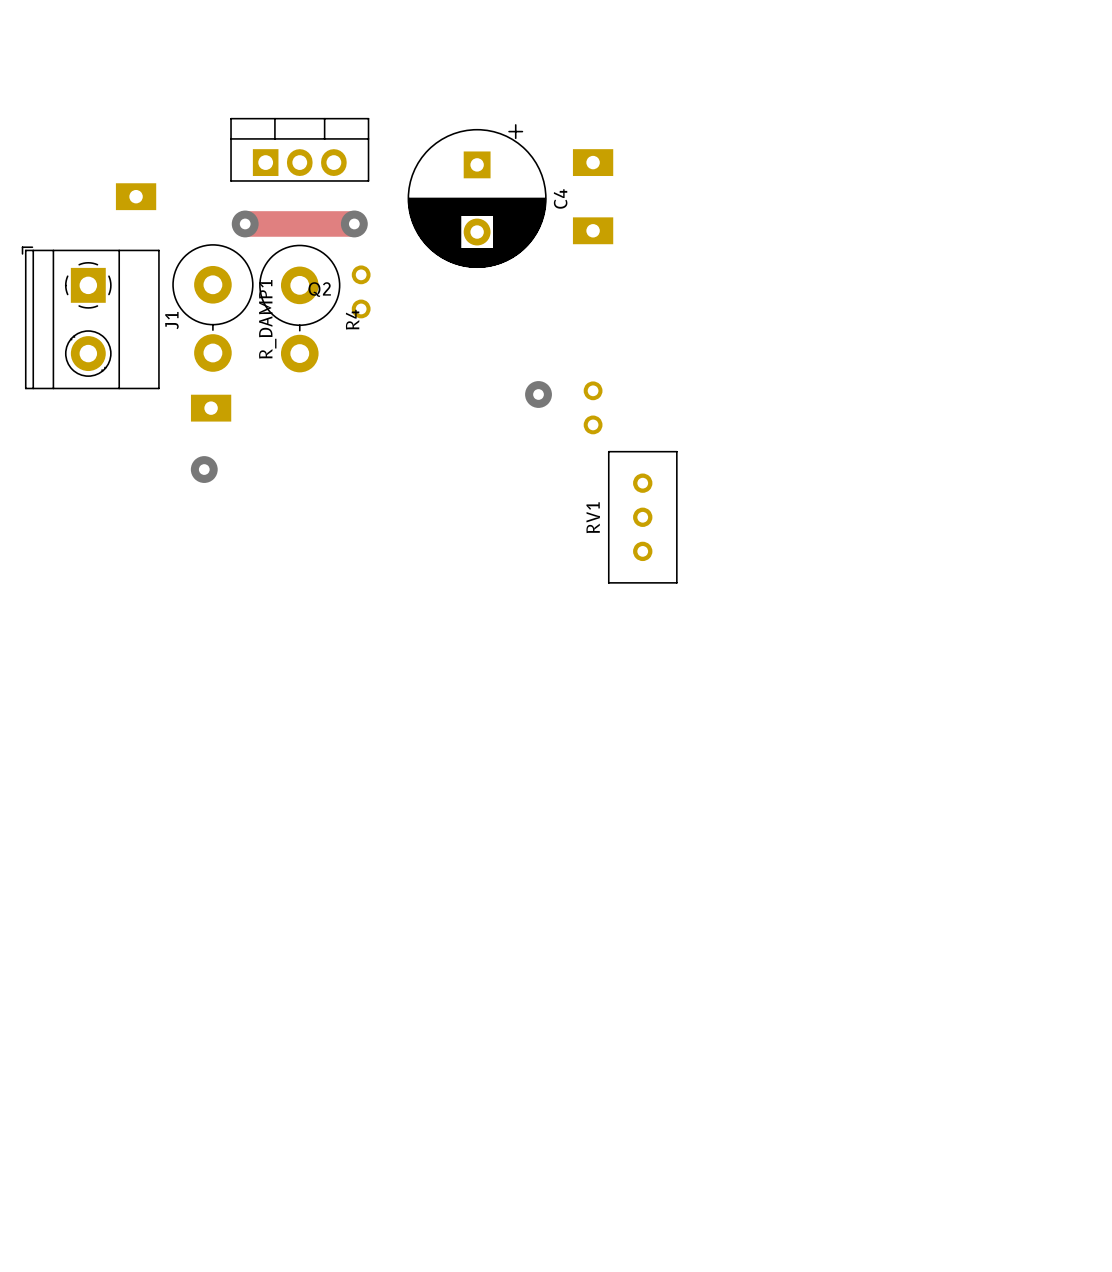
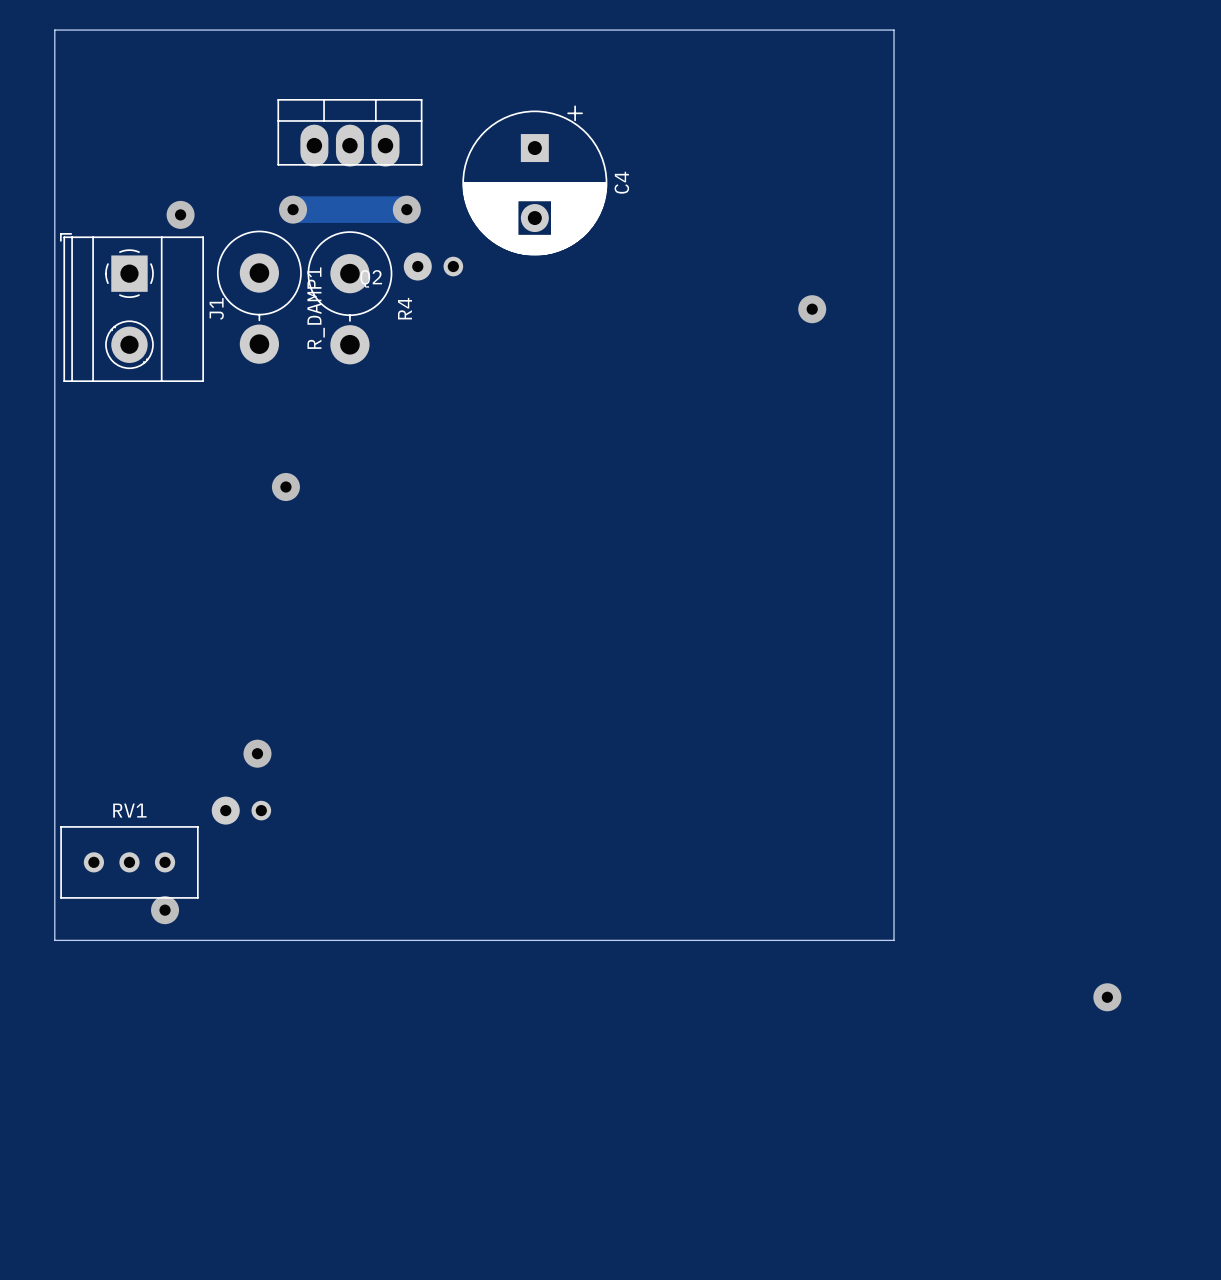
board edge: none -> (54, 30) (894, 30) (894, 940) (54, 940) (54, 30)
Q2 footprint: [230, 117, 370, 182] -> [277, 99, 423, 167]
part: (593, 162) -> none
part: (136, 196) -> none
via: none -> (180, 214)
part: (593, 230) -> none
part: none -> (433, 266)
part: (361, 291) -> none
via: none -> (812, 309)
via: (538, 394) -> none
part: (593, 407) -> none
part: (211, 408) -> none
via position: (204, 469) -> (285, 487)
RV1 rotation: 0° (642, 517) -> 90° clockwise (129, 862)
RV1 position: (642, 517) -> (129, 862)
via: none -> (257, 753)
part: none -> (241, 810)
via: none -> (165, 910)
via: none -> (1107, 997)

